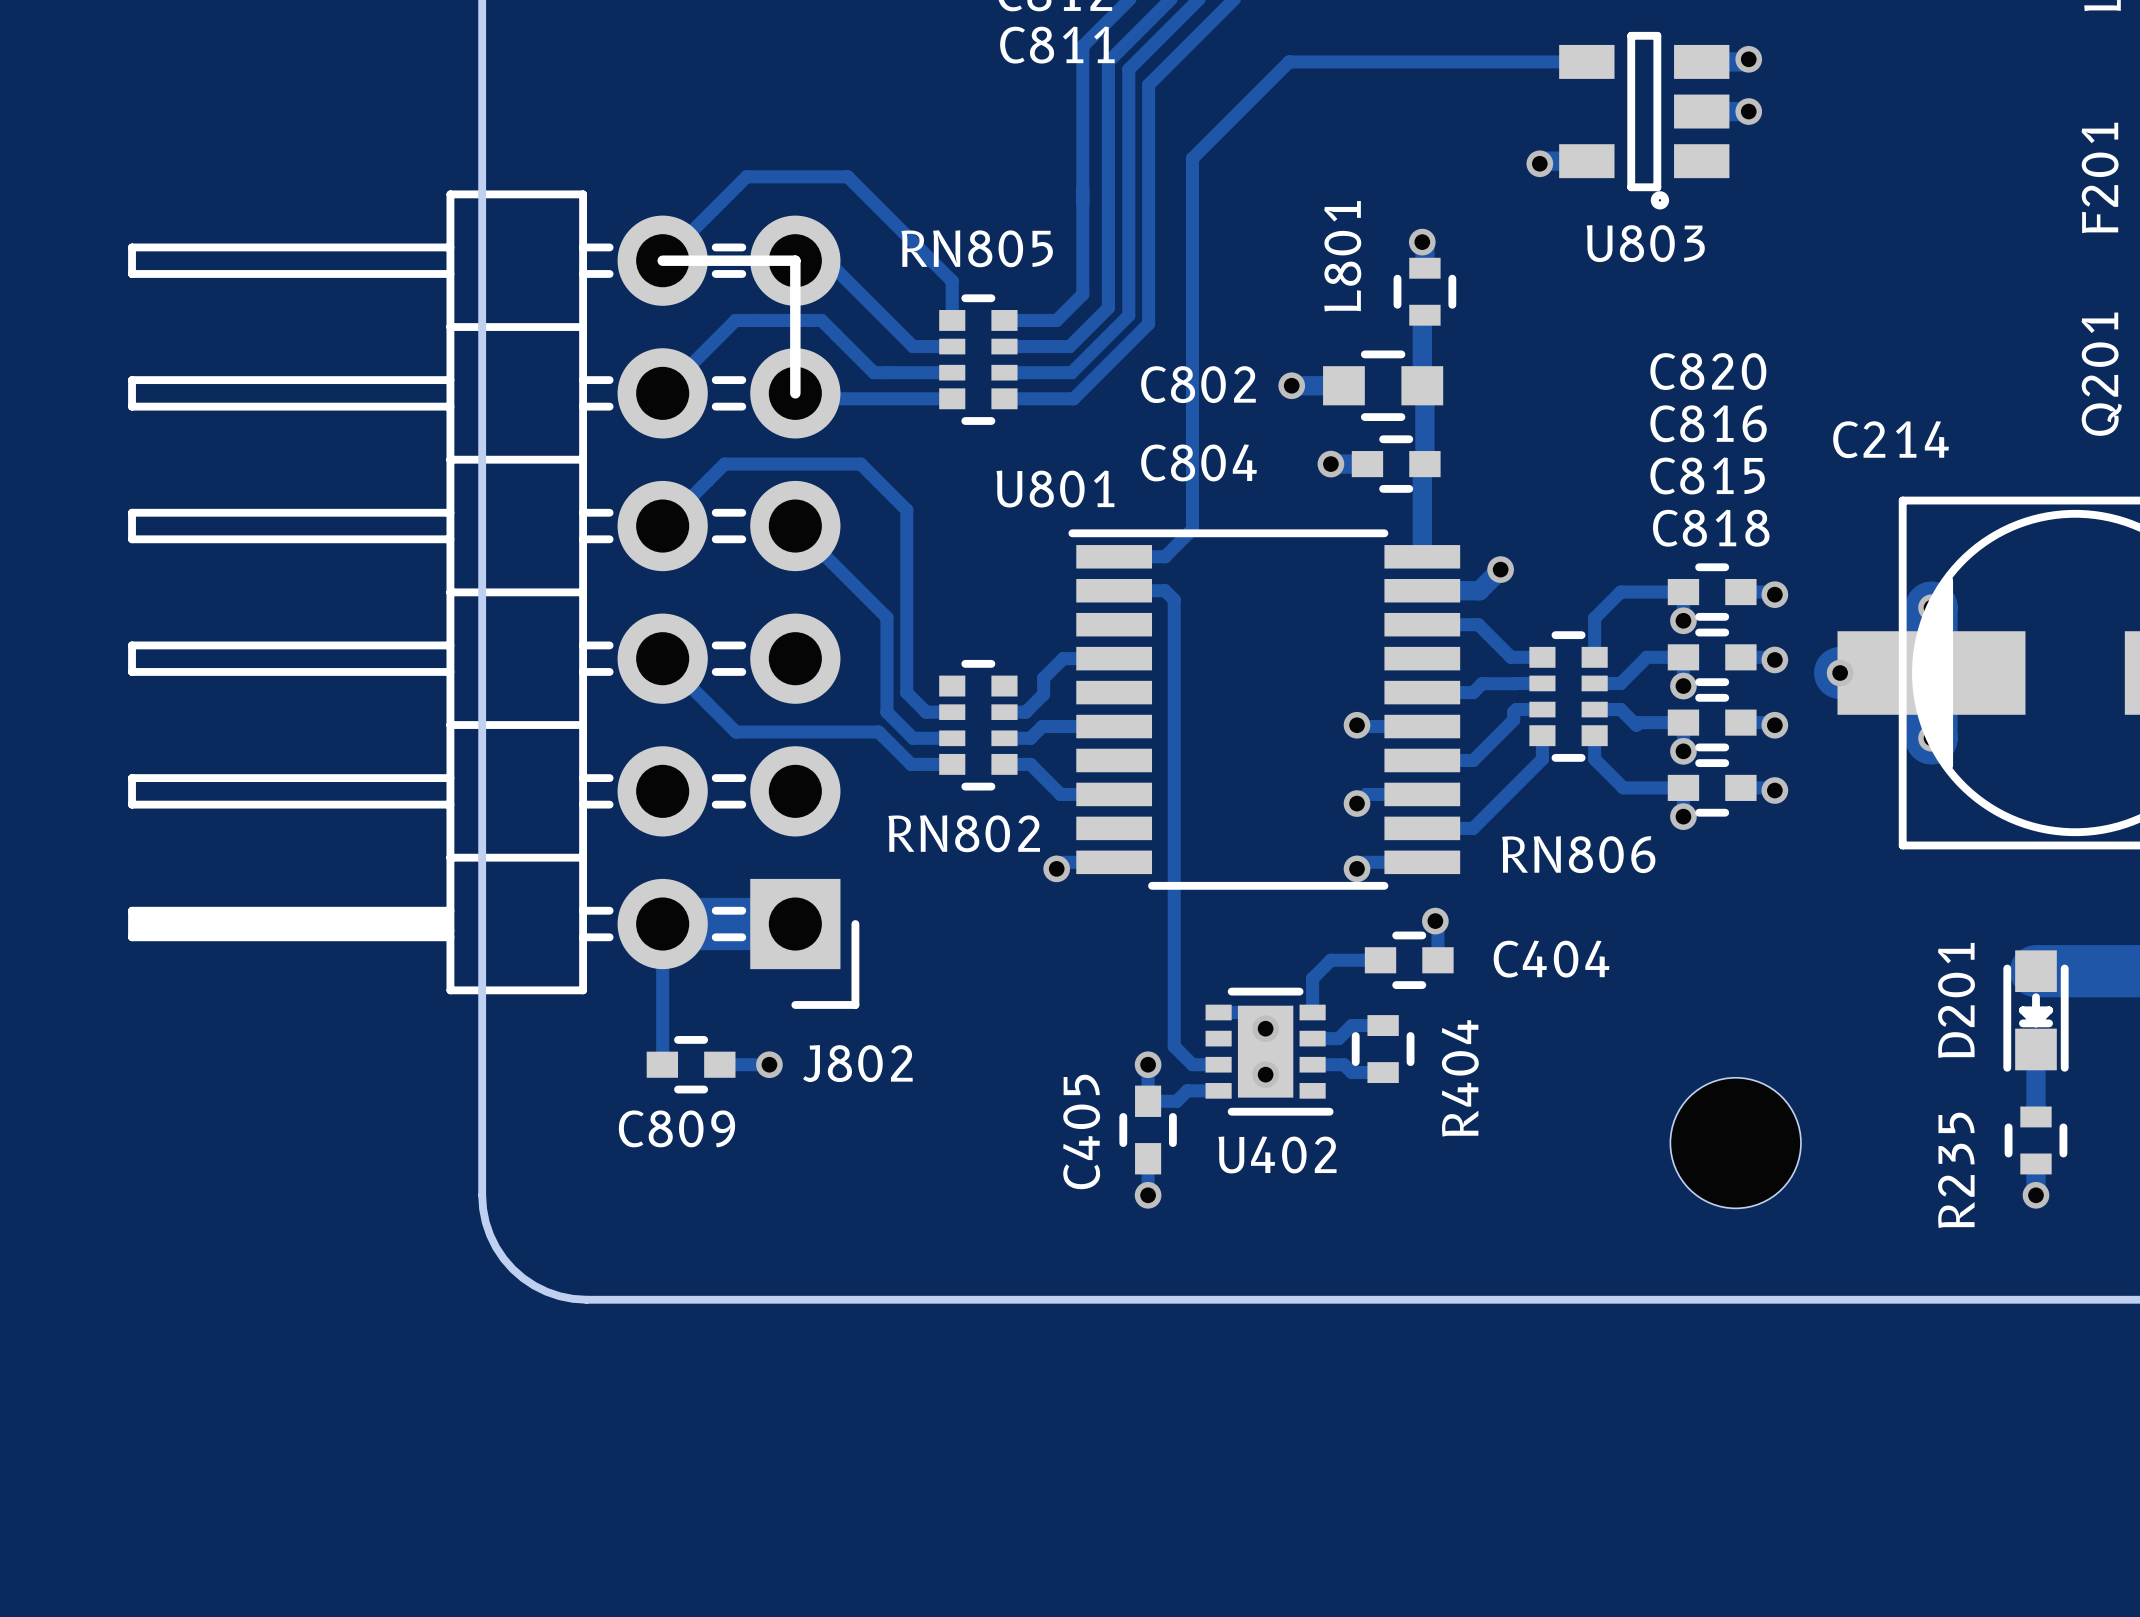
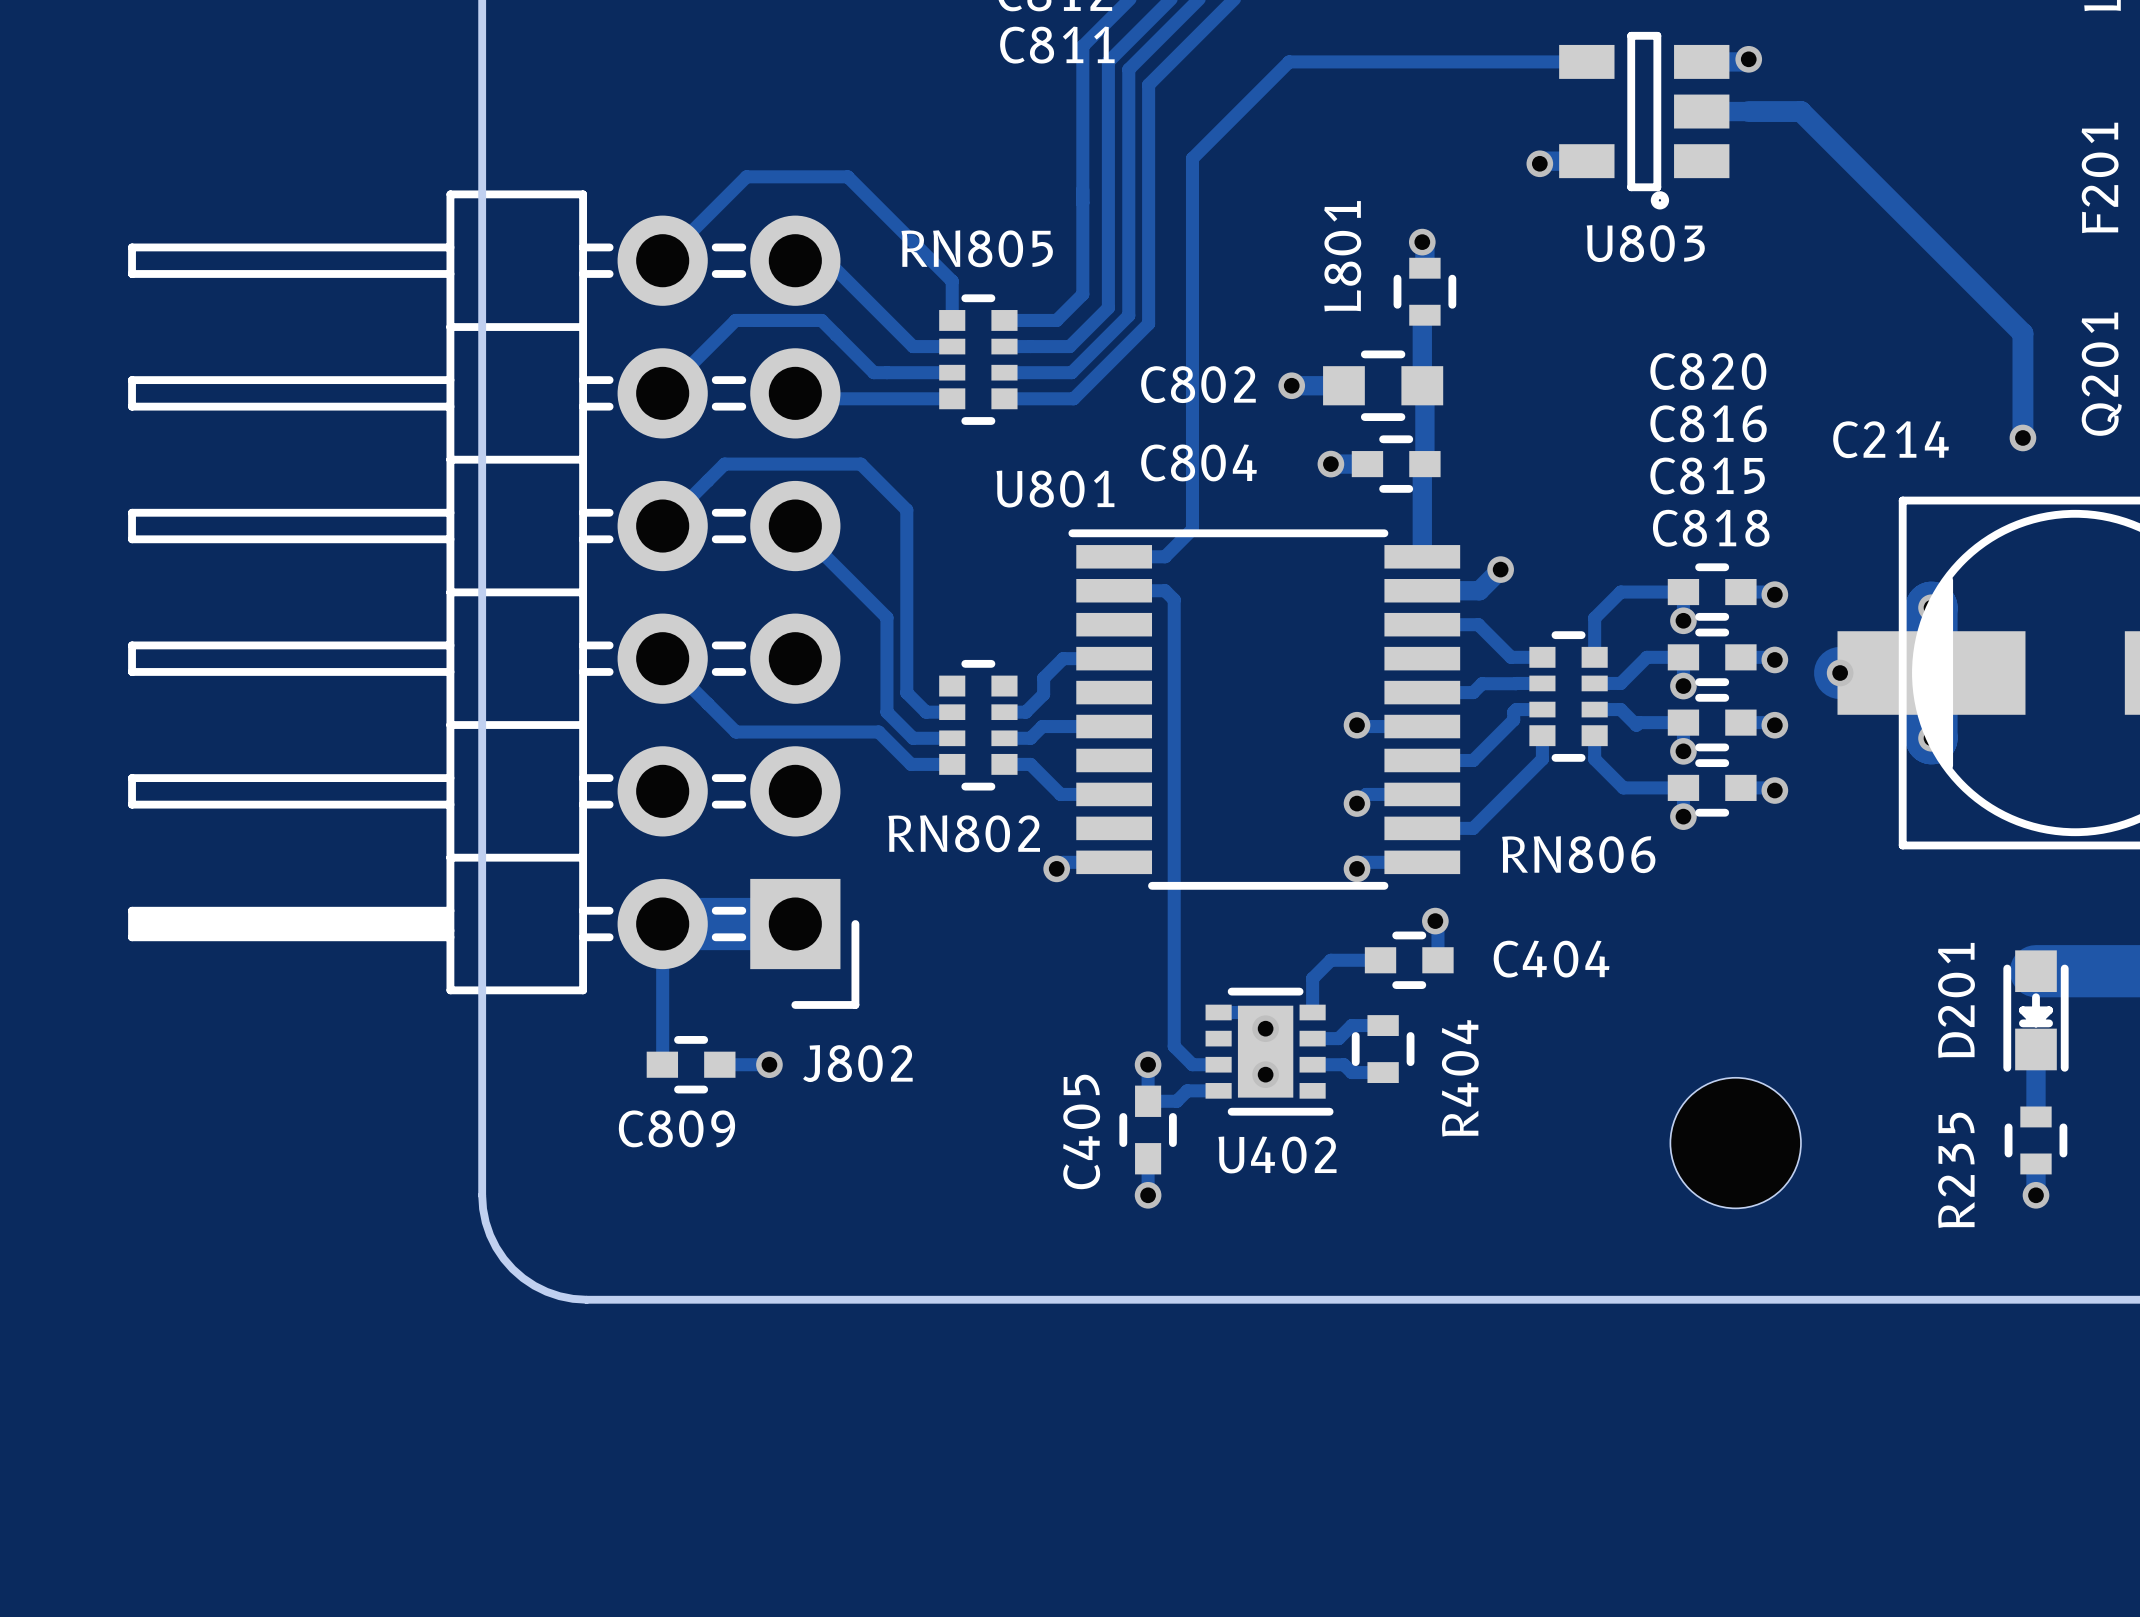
track: none -> (1748, 111) (1800, 111) (2022, 333) (2022, 437)
via: (1748, 111) -> none
line: (662, 260) (795, 260) (795, 393) -> none
via: none -> (2022, 437)

